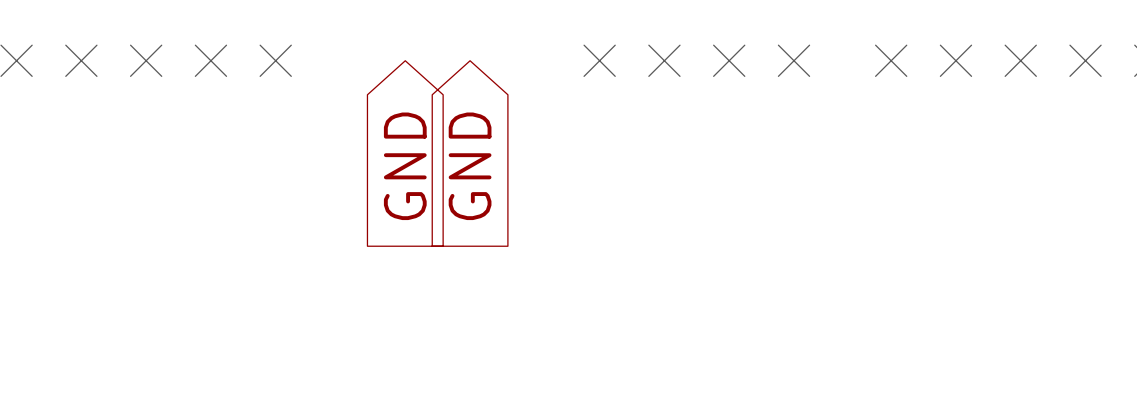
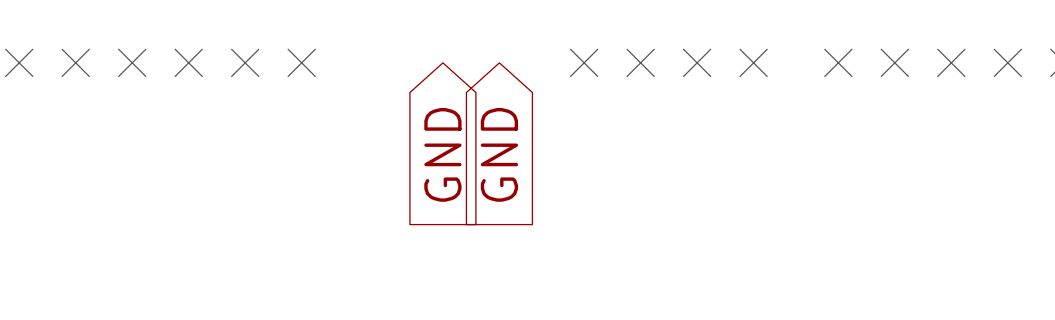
global label: GND (405, 166) -> none
global label: none -> GND (442, 154)
global label: GND (470, 166) -> none
global label: none -> GND (499, 154)

